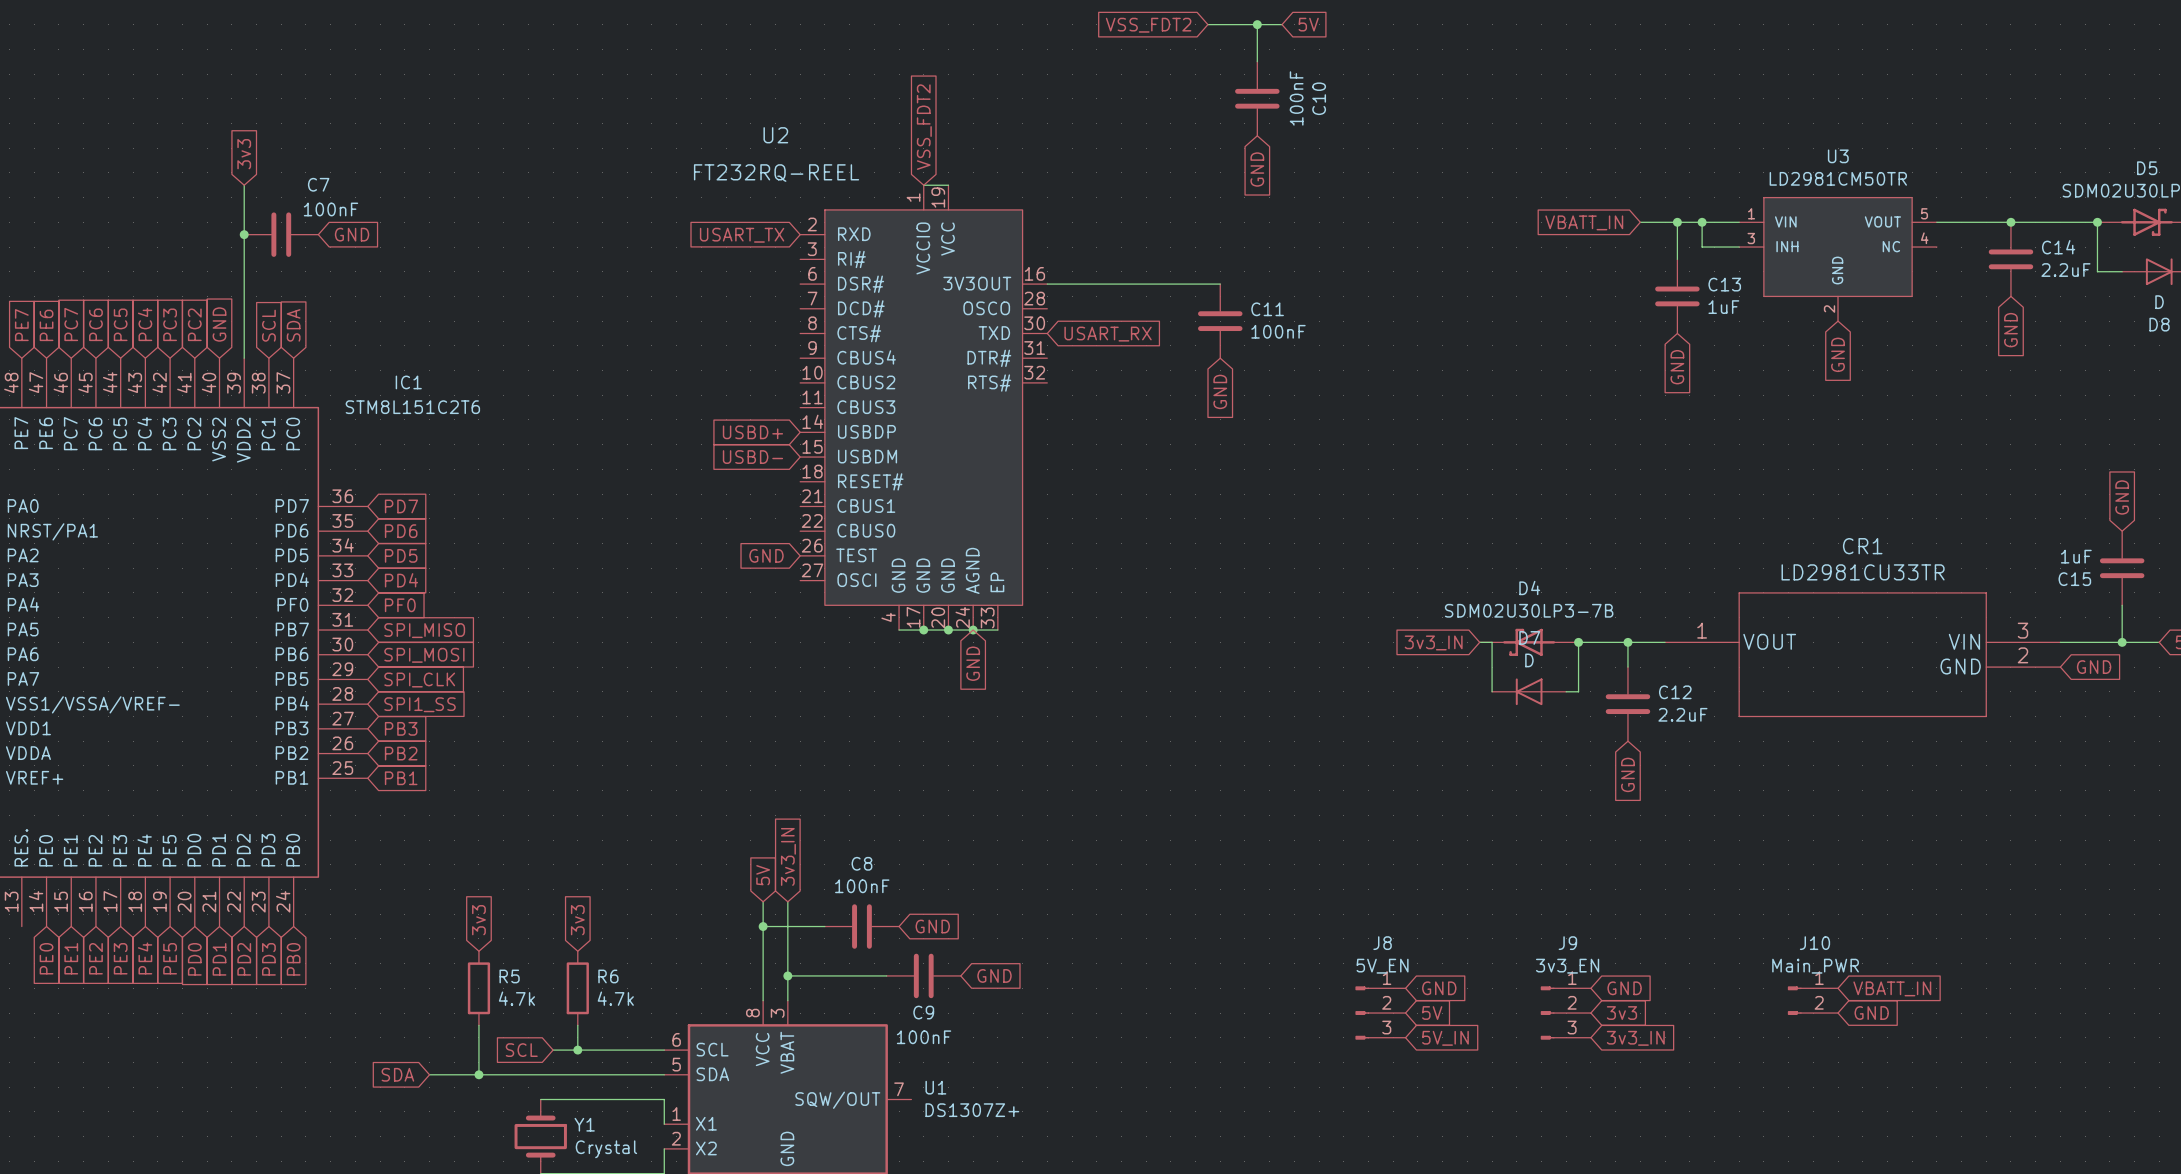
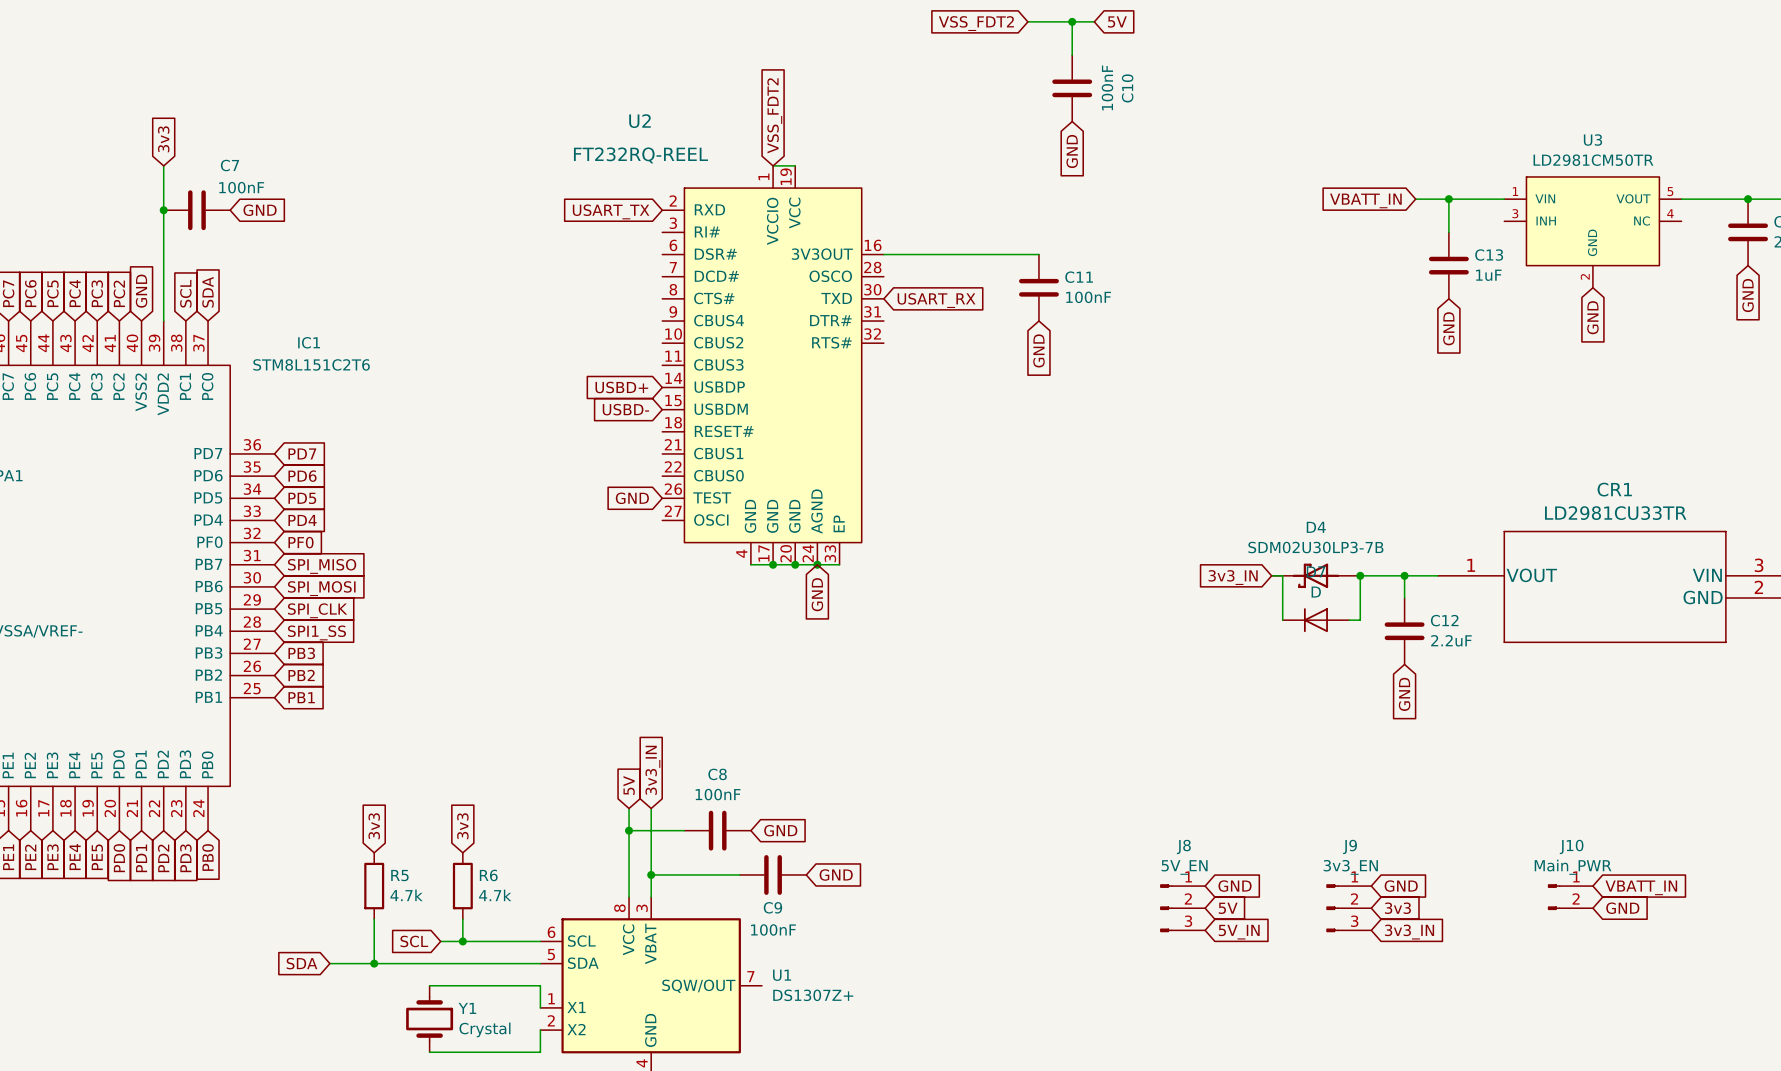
wire: (1702, 222) (1702, 247) (1739, 247) -> none
junction: (1702, 222) -> none

